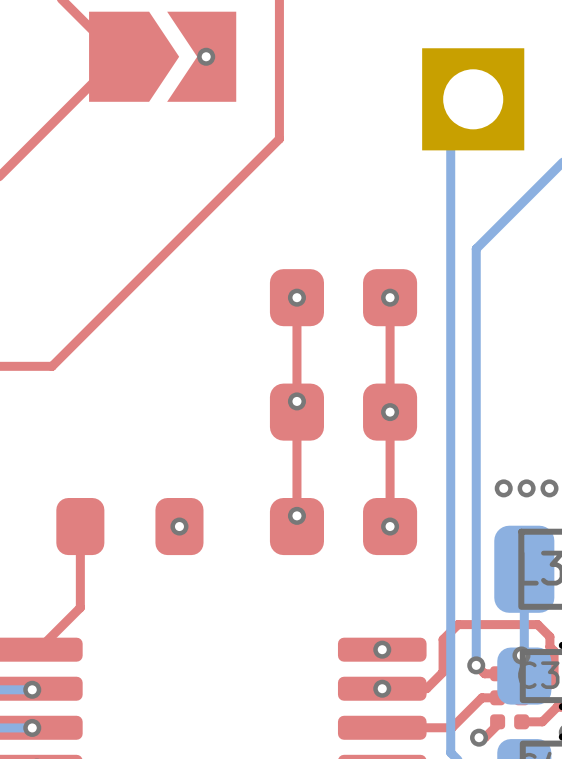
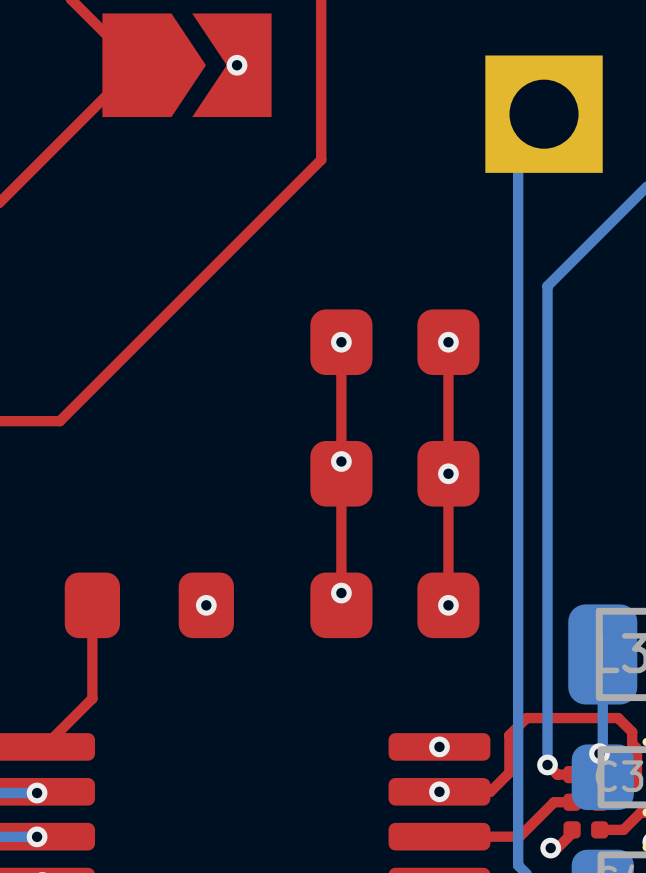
via: (503, 488) -> none
via: (526, 488) -> none
via: (549, 488) -> none

